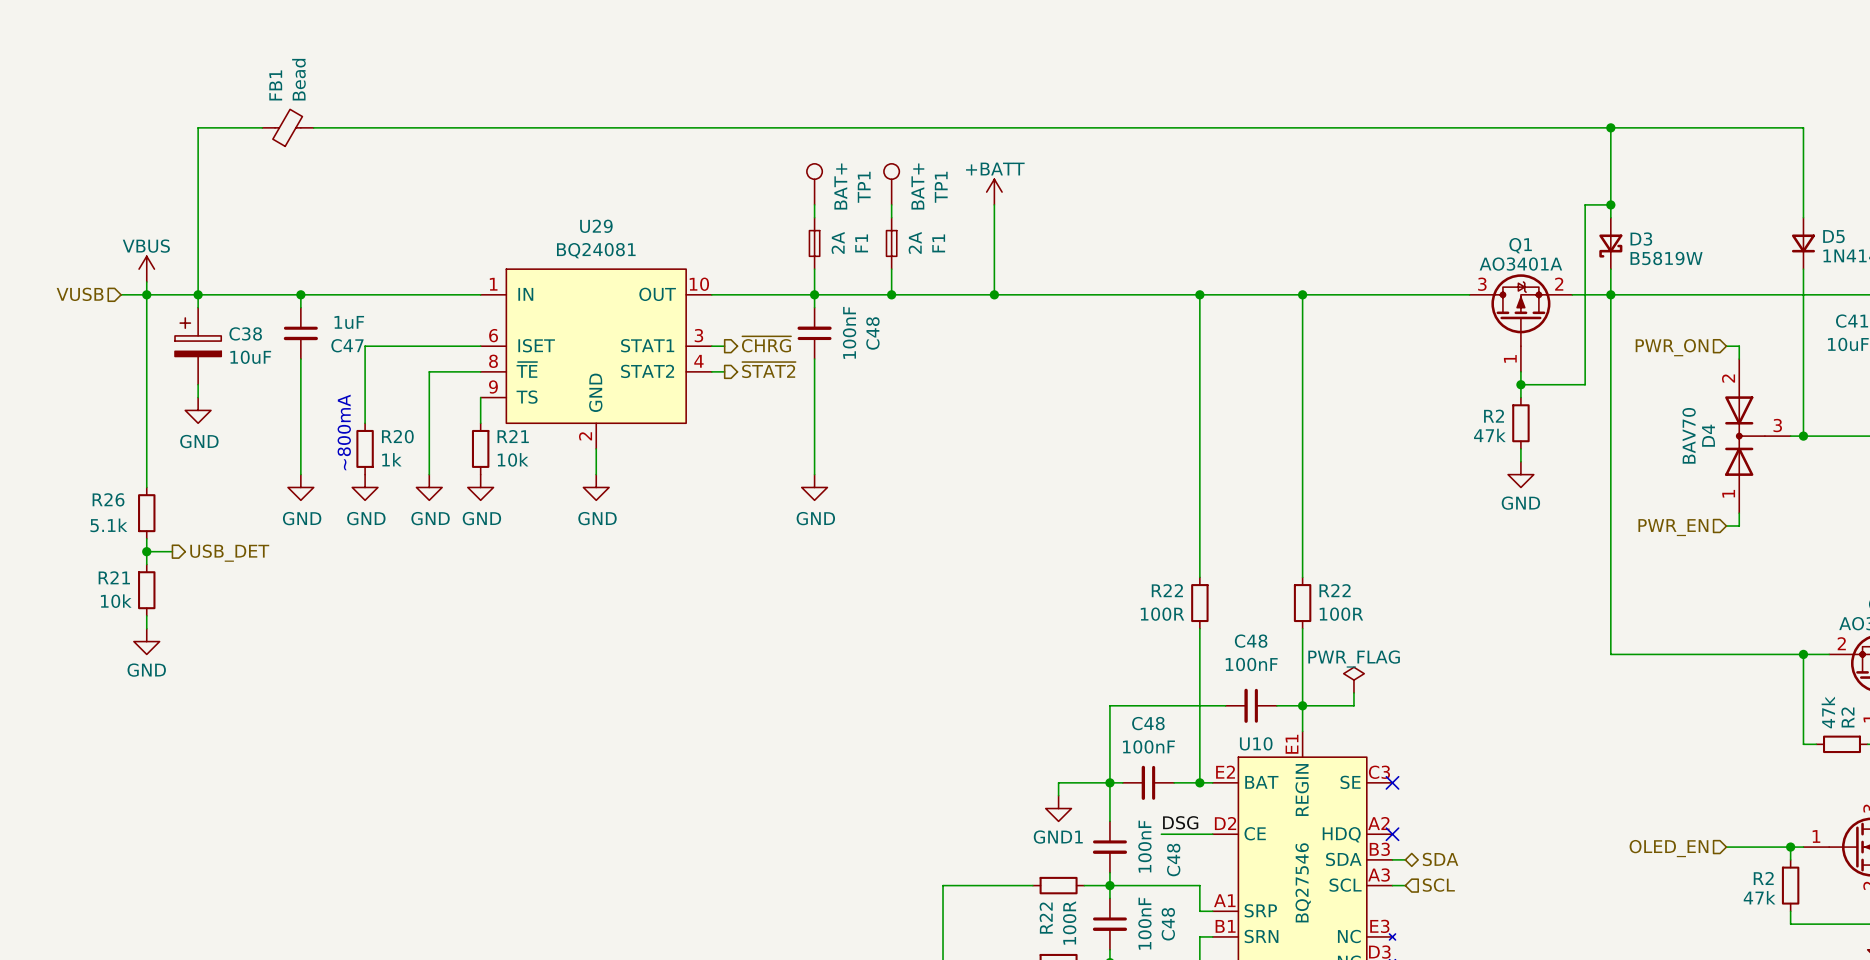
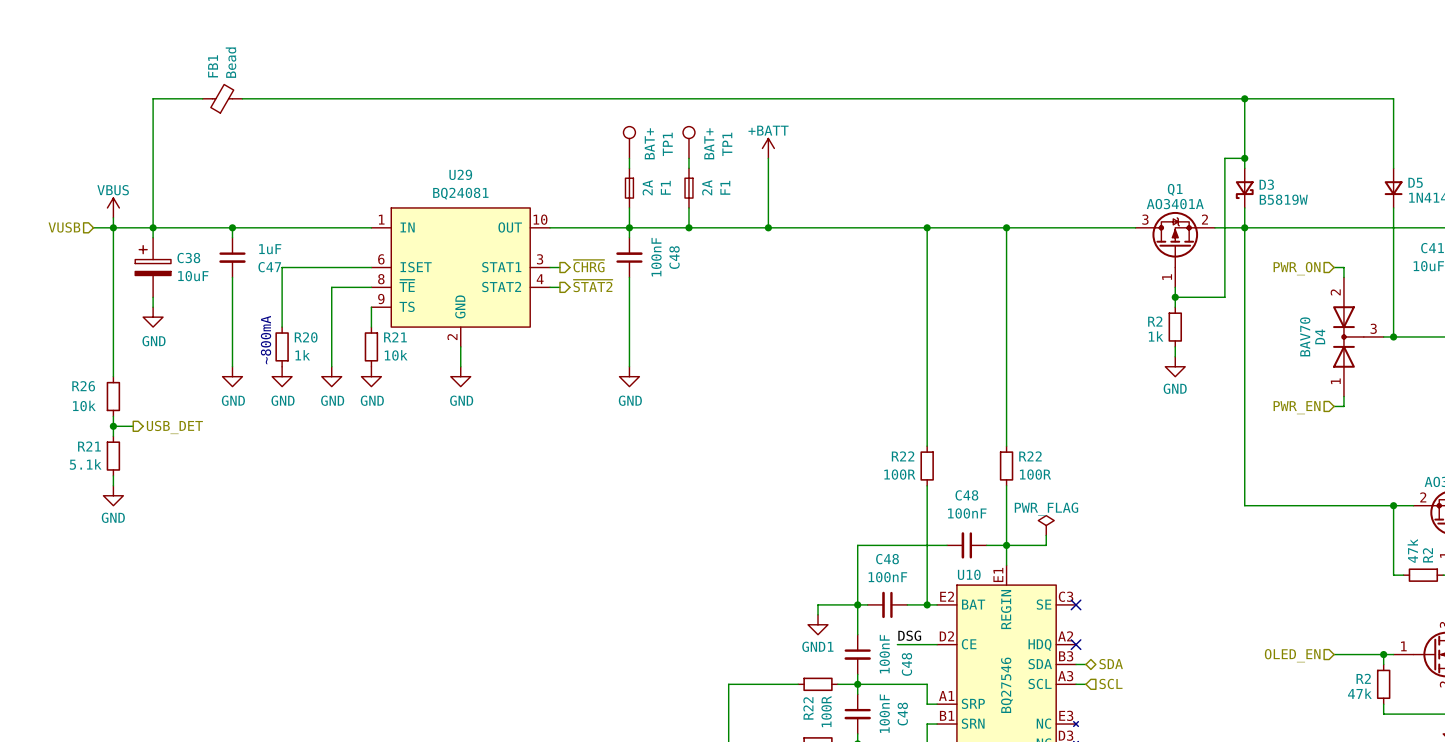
R2 value: 47k (1489, 435) -> 1k (1156, 336)
R26 value: 5.1k (108, 525) -> 10k (84, 405)
R21 value: 10k (116, 601) -> 5.1k (85, 464)

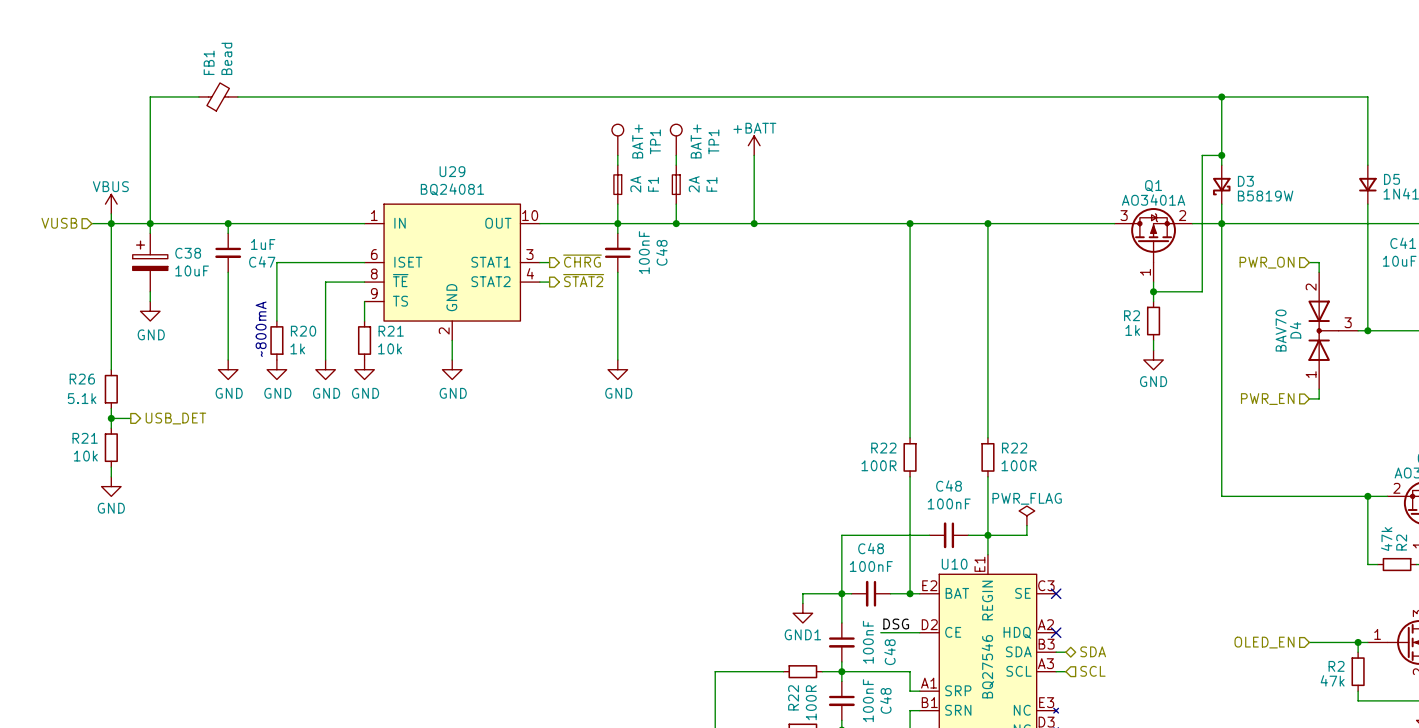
R26 value: 10k (84, 405) -> 5.1k (82, 398)
R21 value: 5.1k (85, 464) -> 10k (85, 456)

